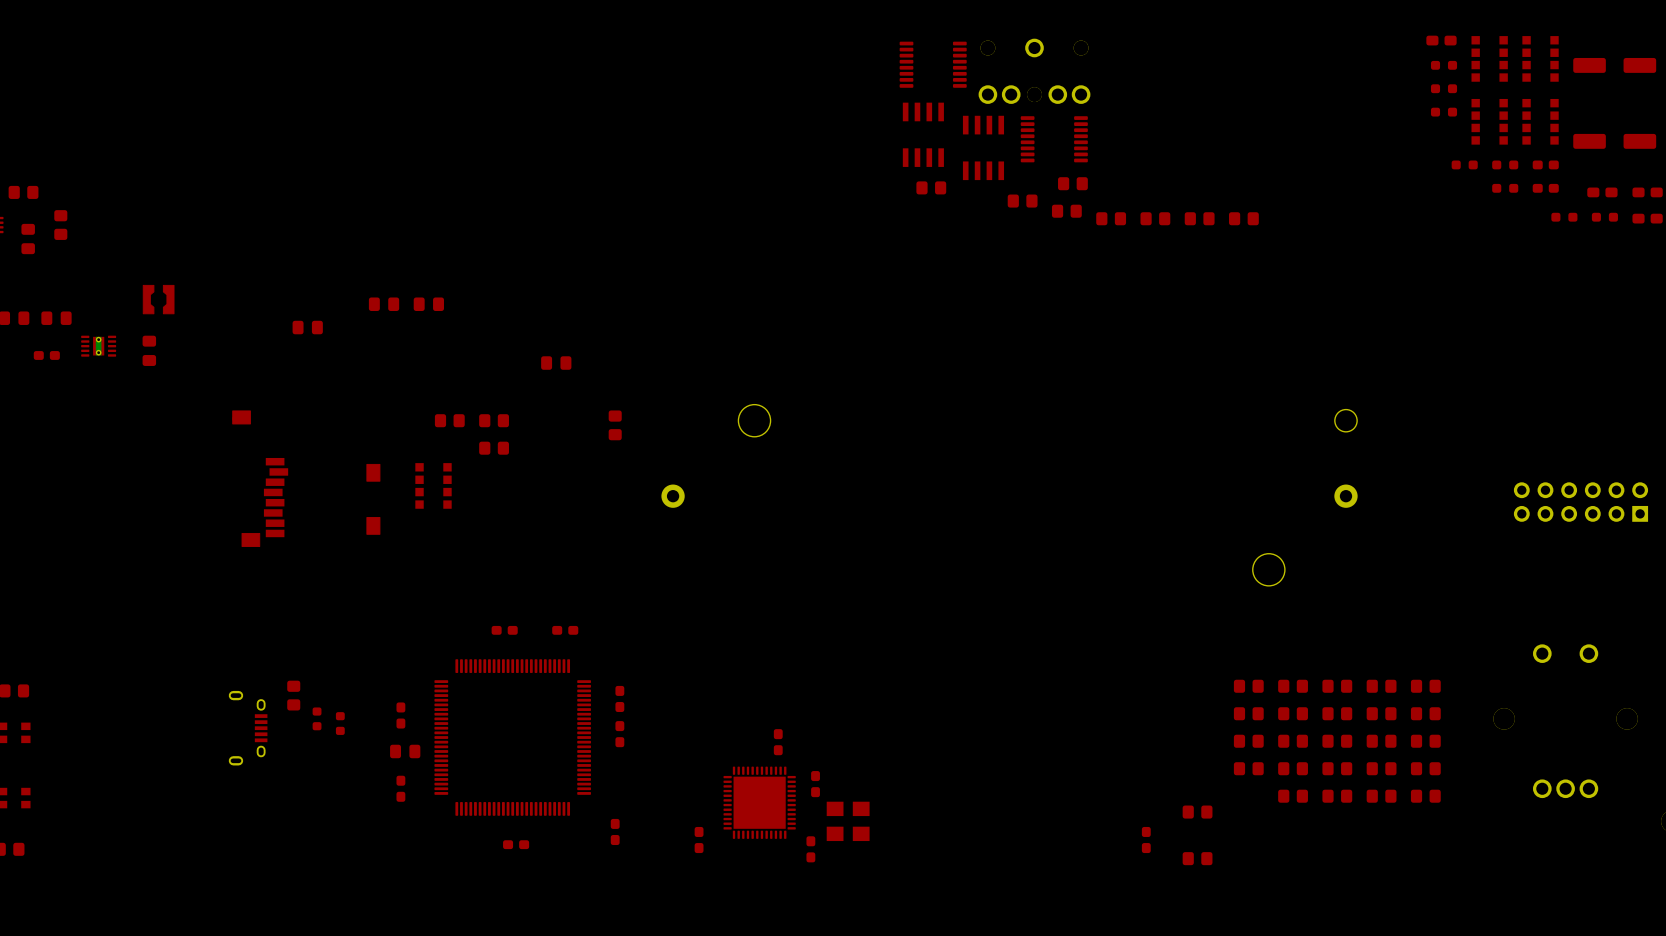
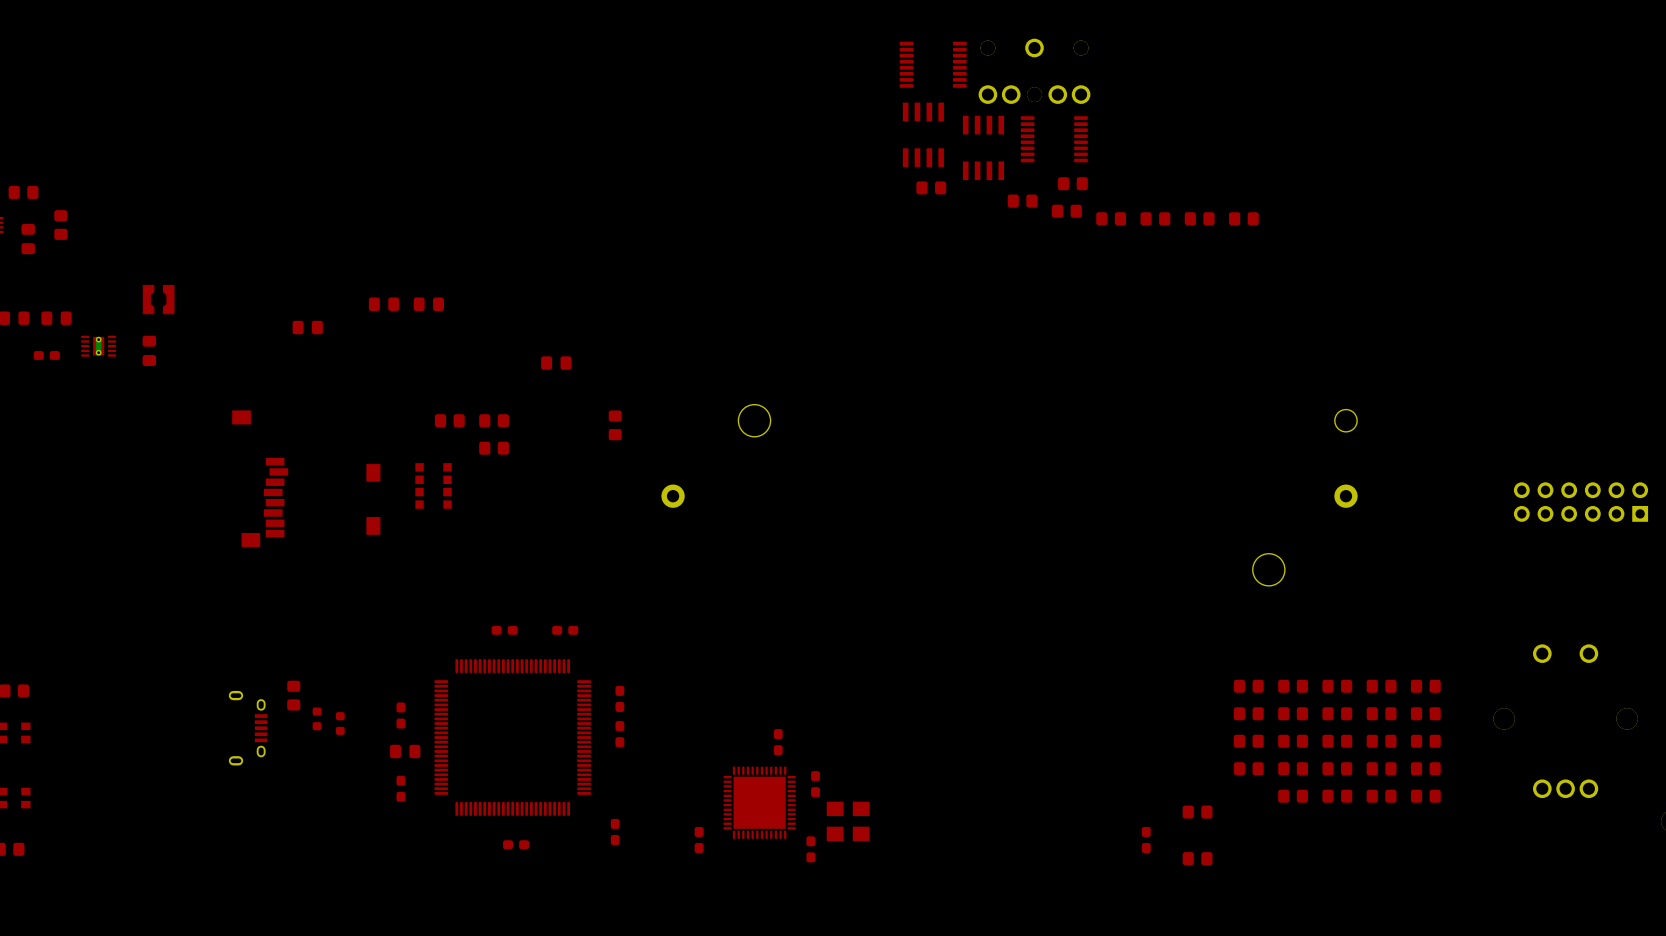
part: (1441, 40) -> none
part: (1489, 58) -> none
part: (1540, 58) -> none
part: (1444, 65) -> none
part: (1614, 65) -> none
part: (1444, 88) -> none
part: (1444, 112) -> none
part: (1489, 121) -> none
part: (1540, 121) -> none
part: (1614, 141) -> none
part: (1464, 164) -> none
part: (1505, 164) -> none
part: (1545, 164) -> none
part: (1505, 188) -> none
part: (1545, 188) -> none
part: (1602, 192) -> none
part: (1647, 192) -> none
part: (1564, 217) -> none
part: (1604, 217) -> none
part: (1647, 218) -> none

